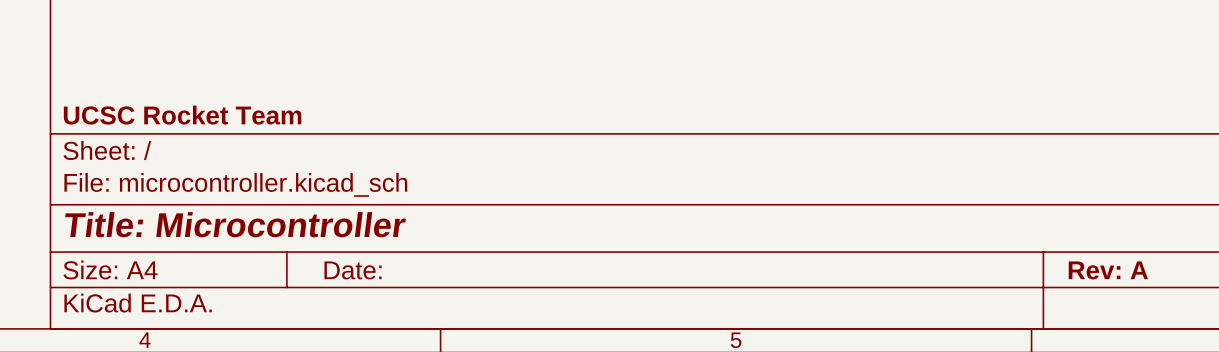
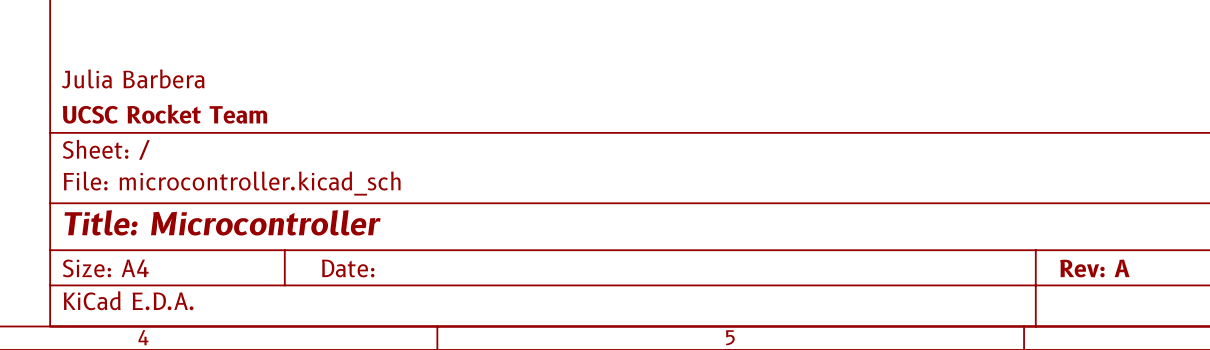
title block: none -> Julia Barbera (133, 78)

